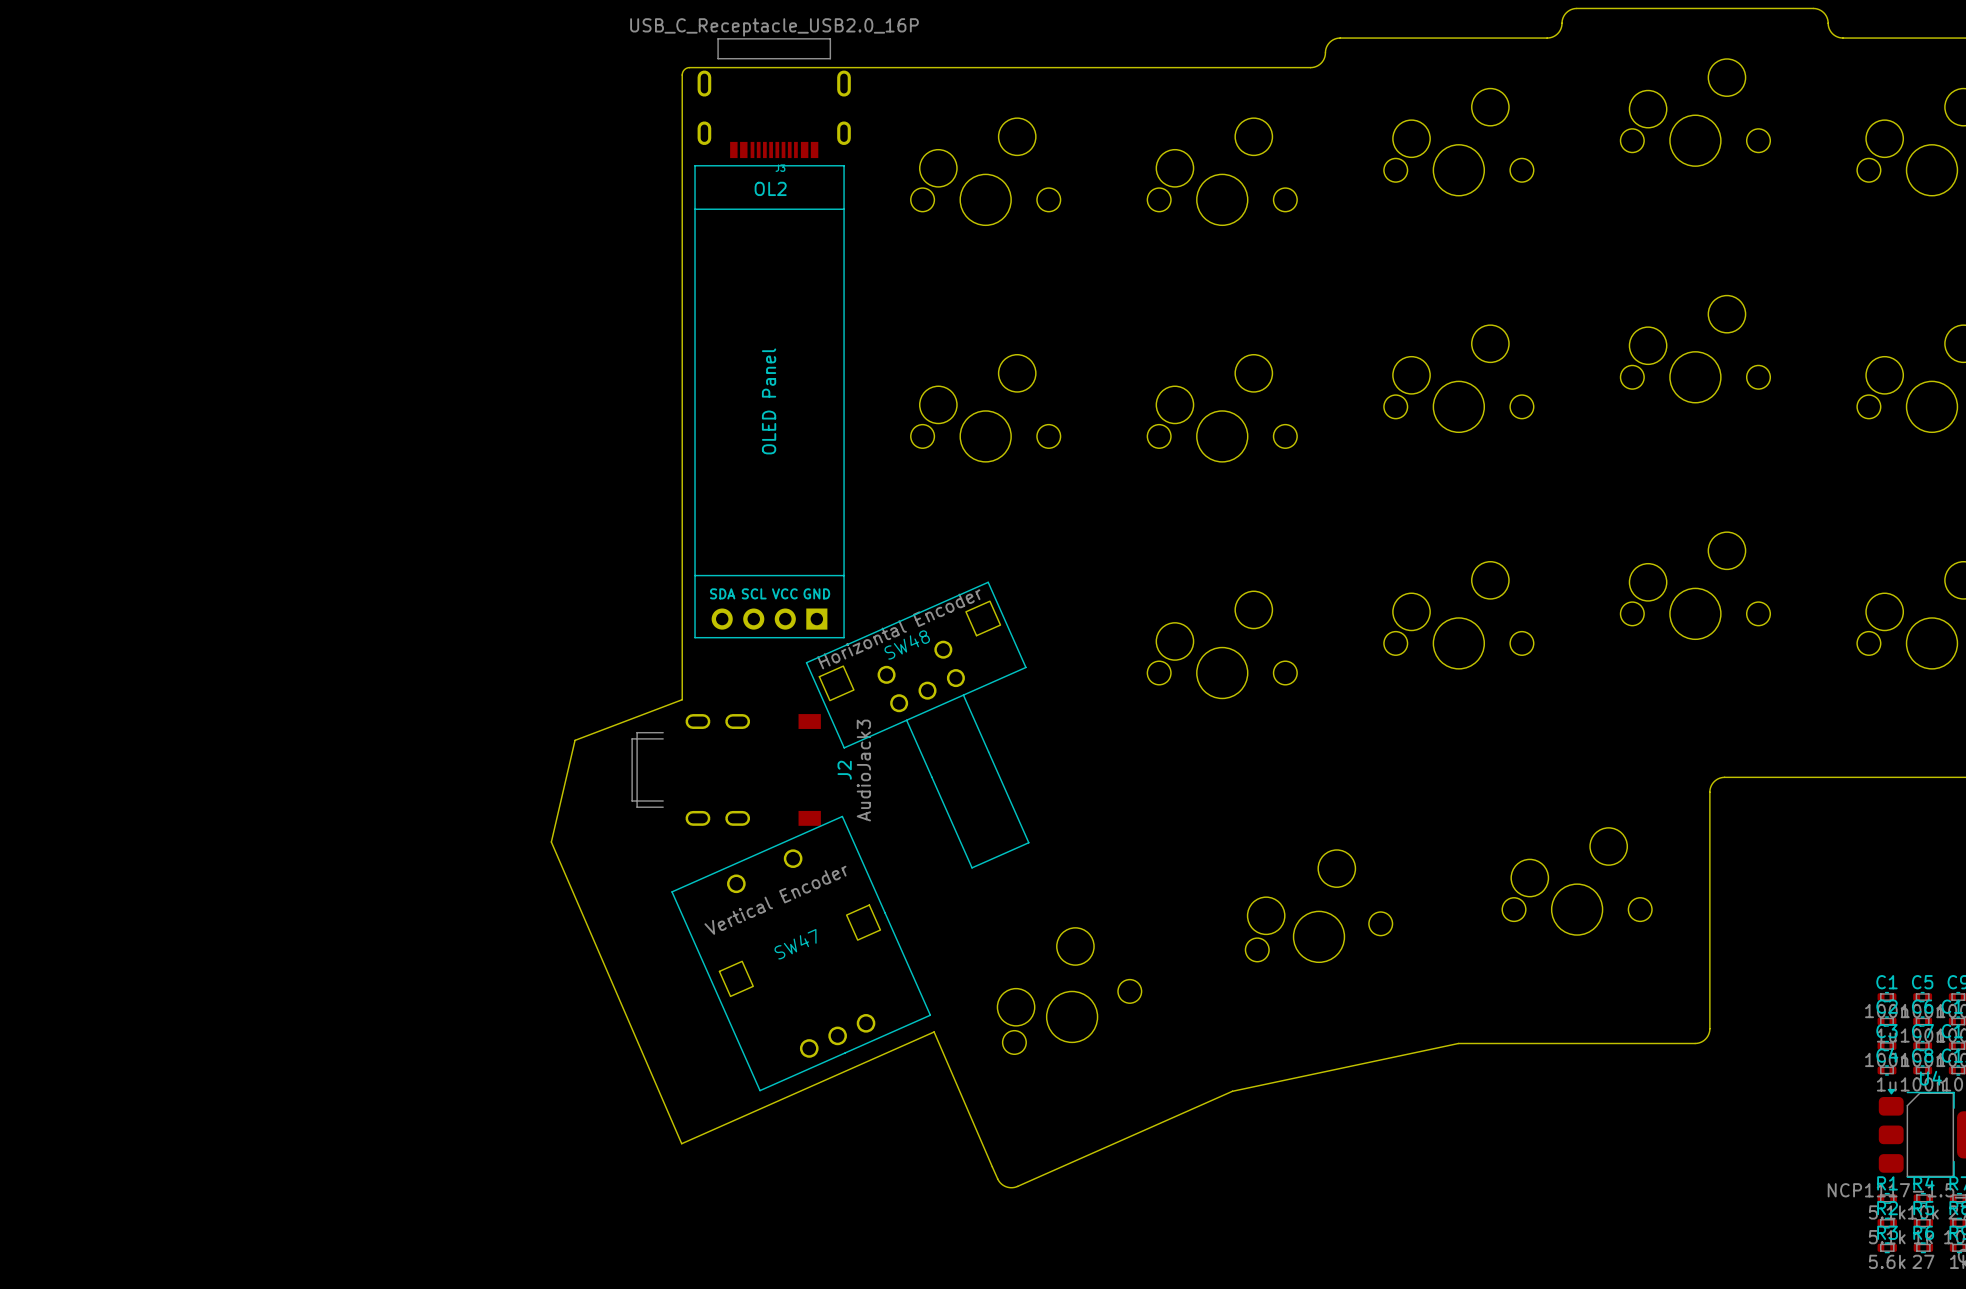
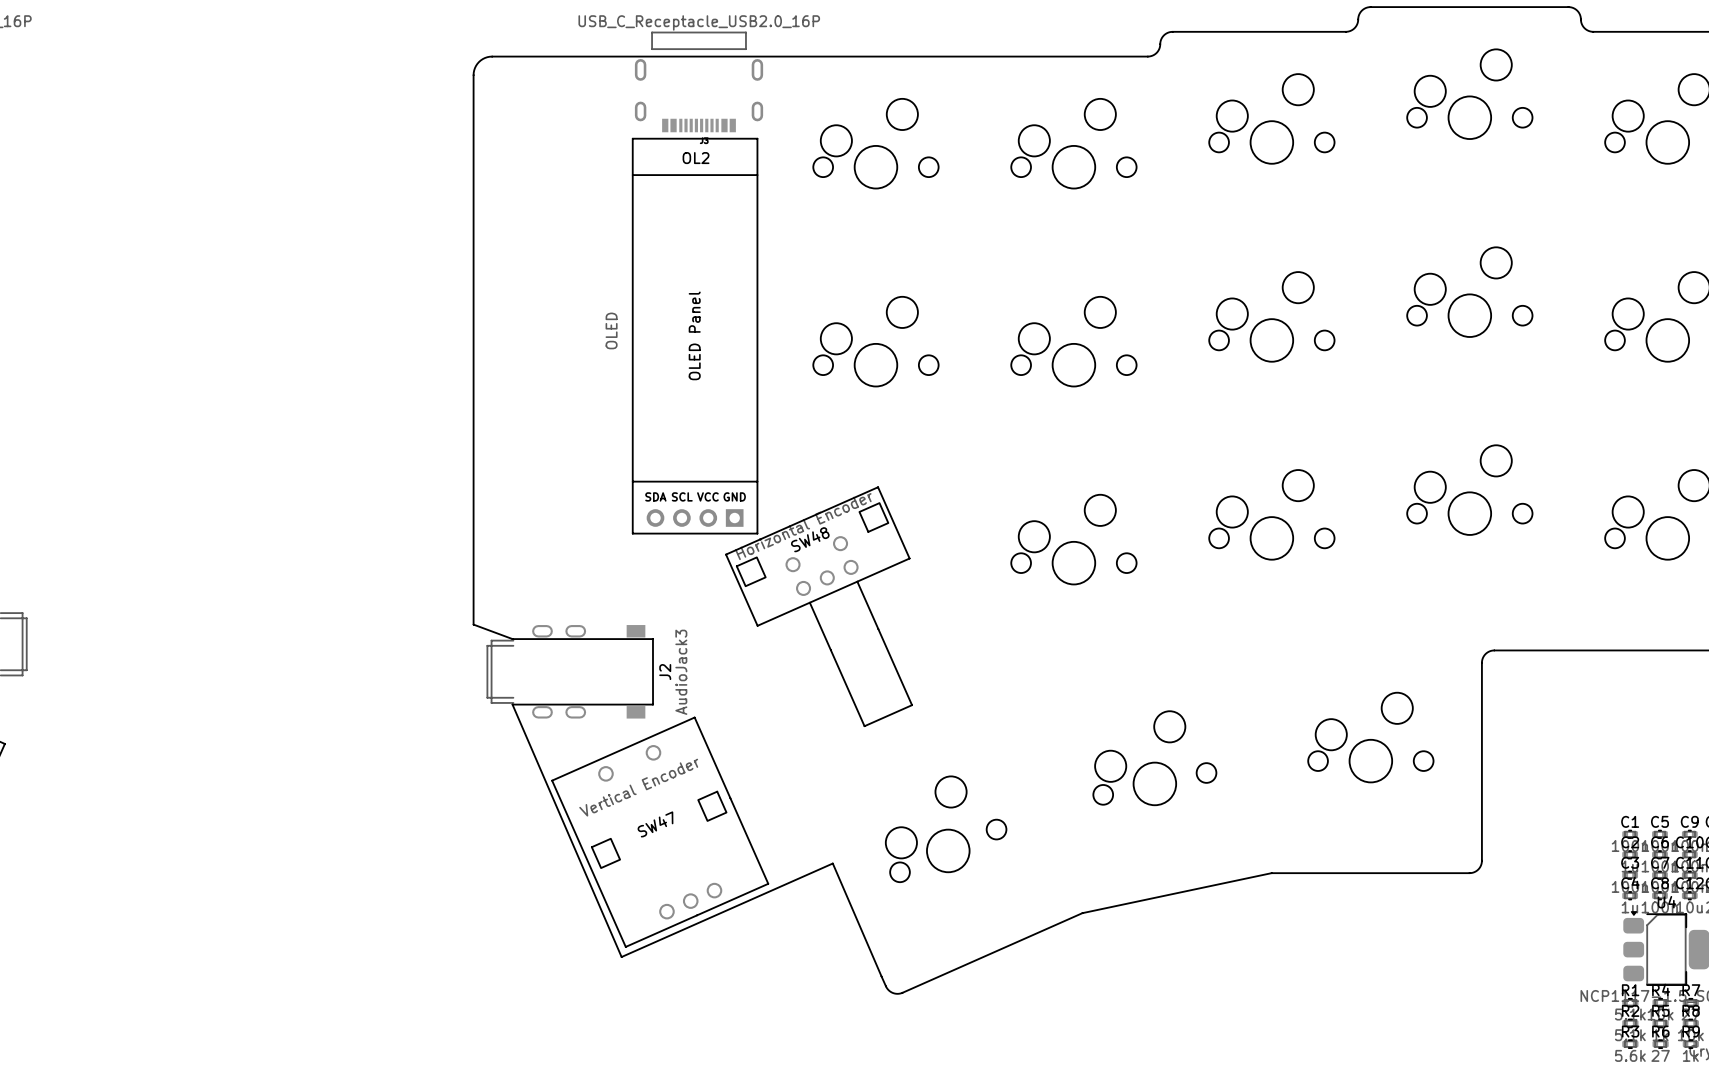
board edge: (689, 67) (684, 69) (682, 75) (682, 699) (575, 740) (551, 842) -> (628, 56) (489, 56) (479, 62) (473, 72) (473, 624) (512, 639) (652, 639) (653, 704) (512, 704)
OL2 value: none -> OLED (611, 330)
J2 position: (726, 769) -> (566, 671)
SW47 position: (801, 953) -> (660, 832)

